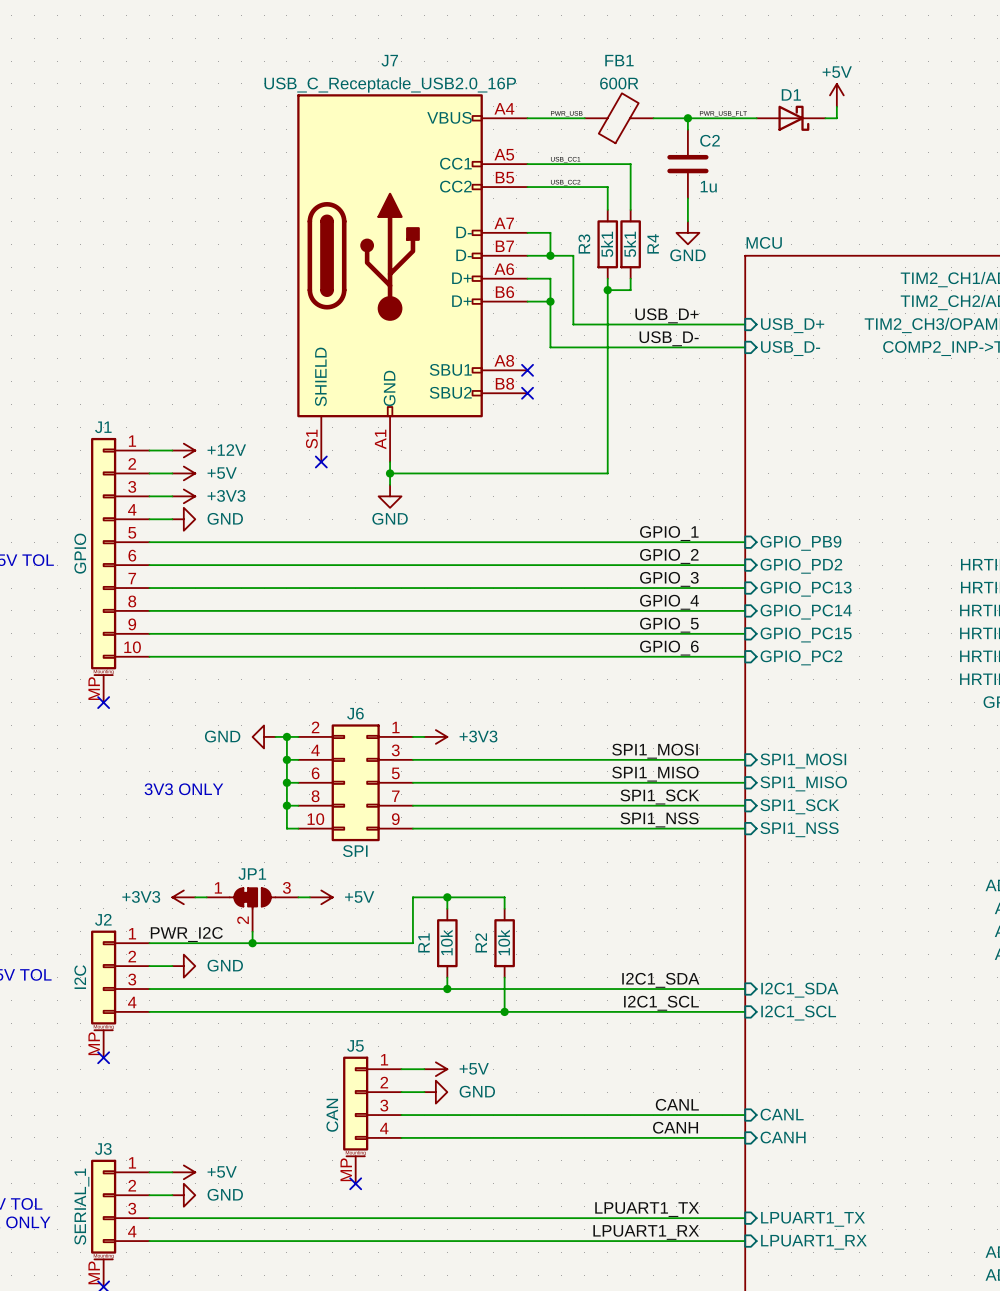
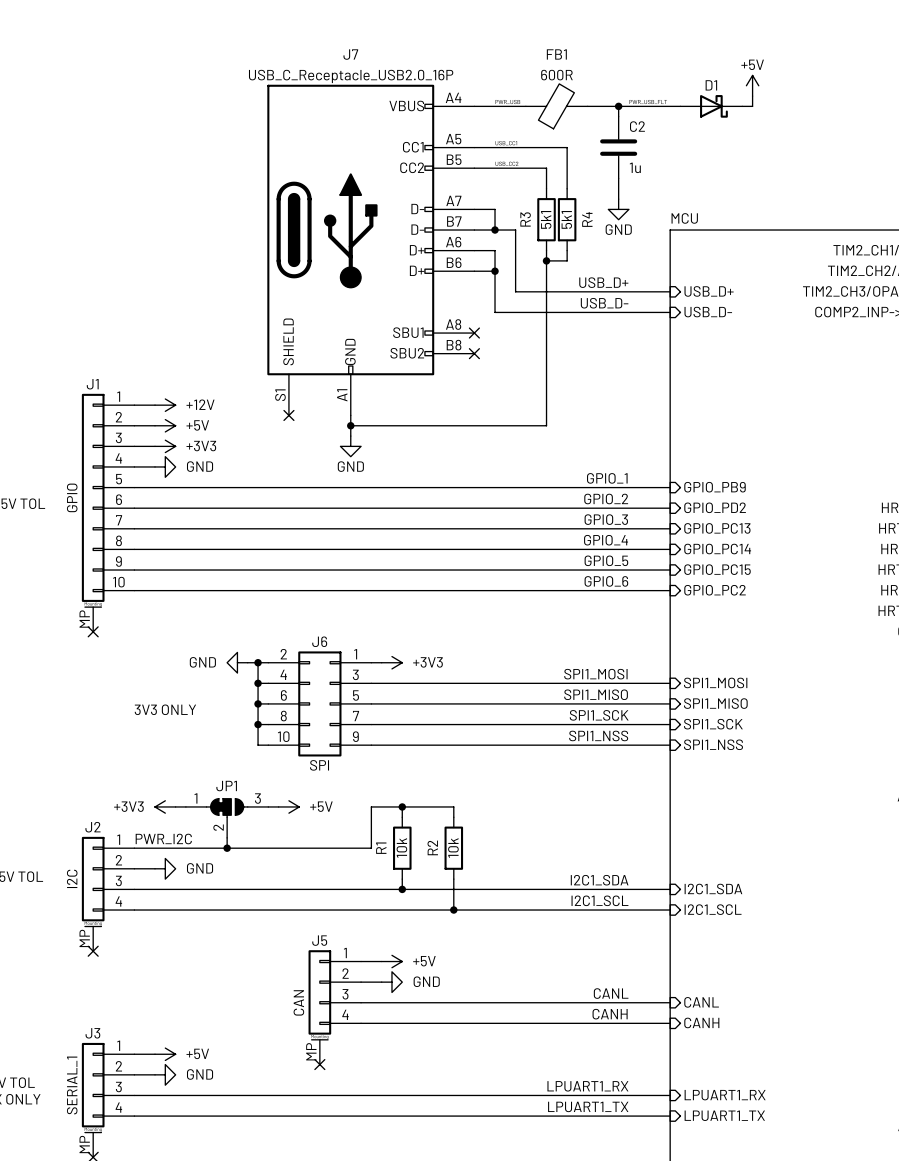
label: LPUART1_TX (647, 1209) -> LPUART1_RX (587, 1086)
sheet pin: LPUART1_TX (813, 1219) -> LPUART1_RX (725, 1095)
label: LPUART1_RX (646, 1232) -> LPUART1_TX (588, 1106)
sheet pin: LPUART1_RX (813, 1242) -> LPUART1_TX (724, 1115)

